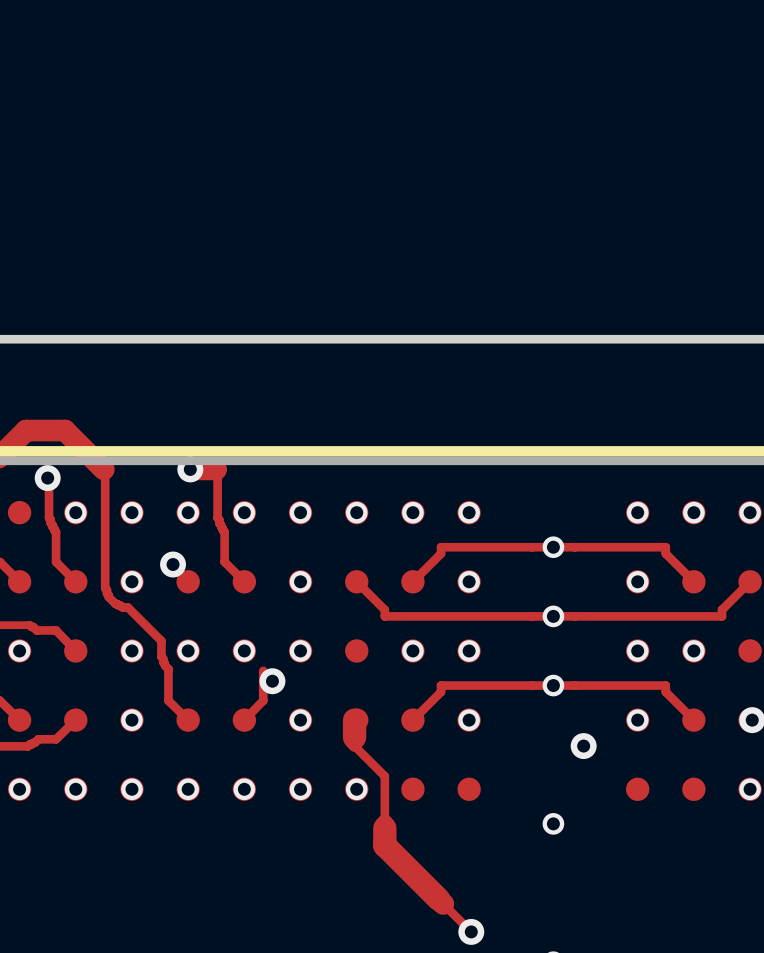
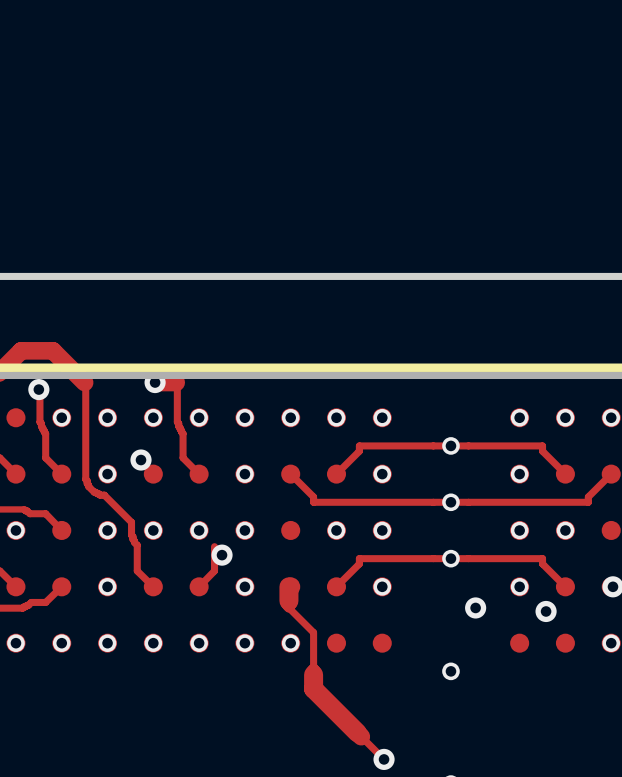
via: none -> (546, 611)

